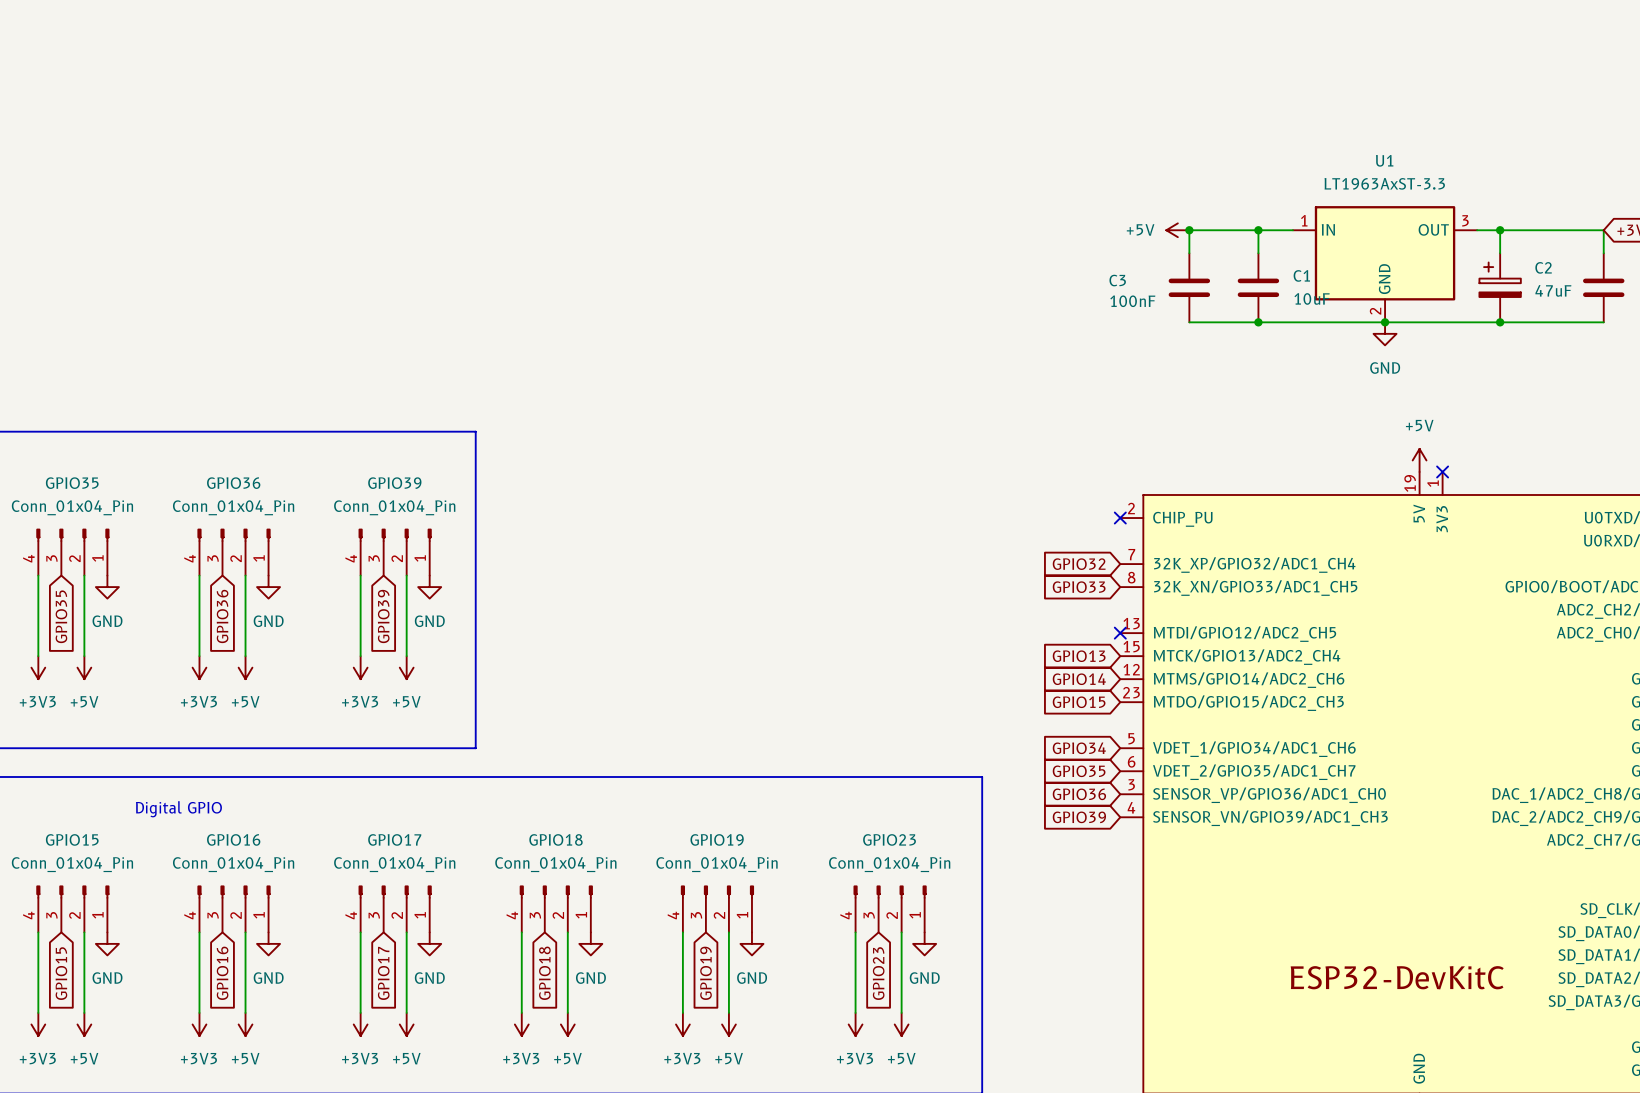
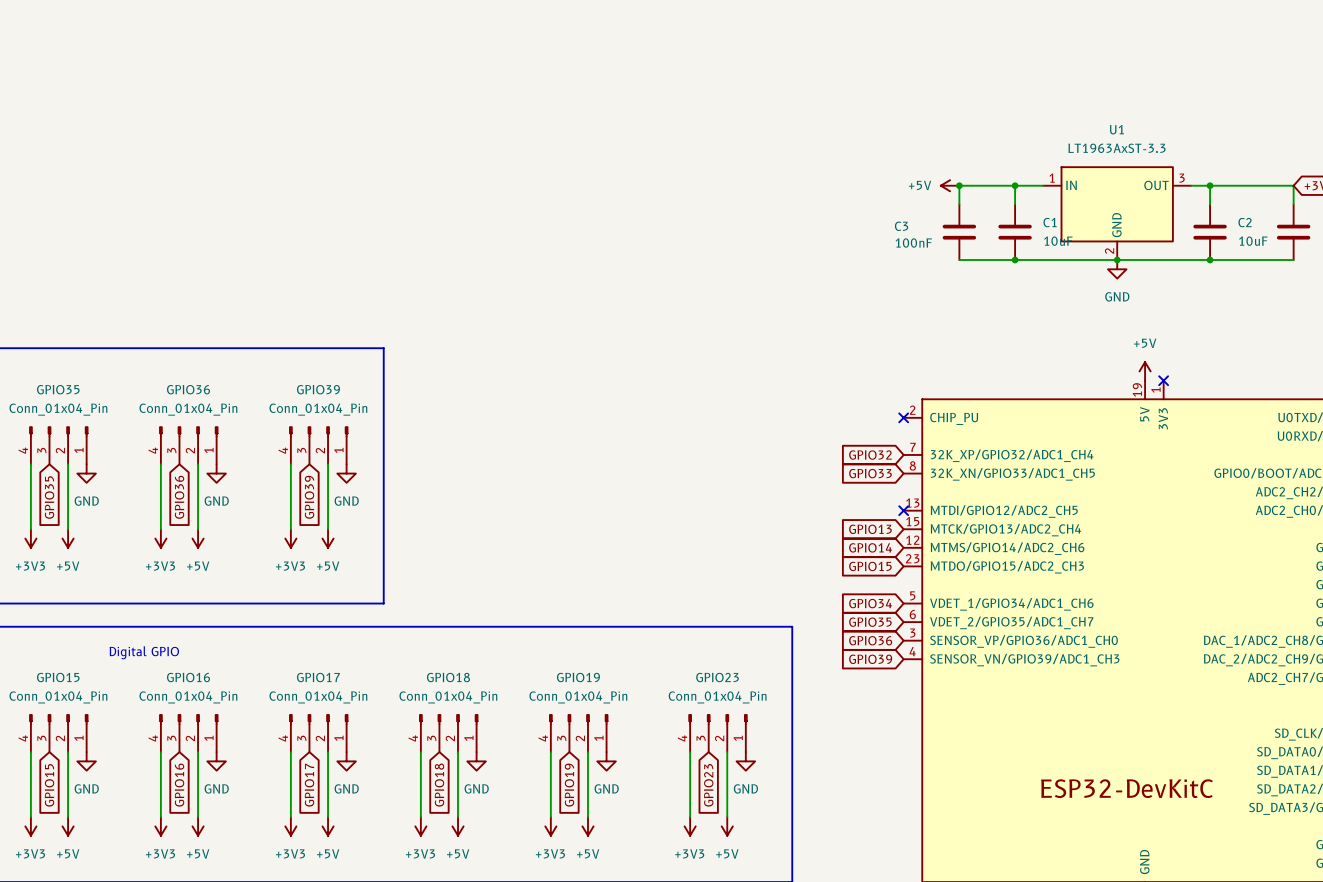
C2 symbol: [1479, 253, 1521, 323] -> [1193, 204, 1227, 261]
C2 value: 47uF (1553, 290) -> 10uF (1253, 241)

